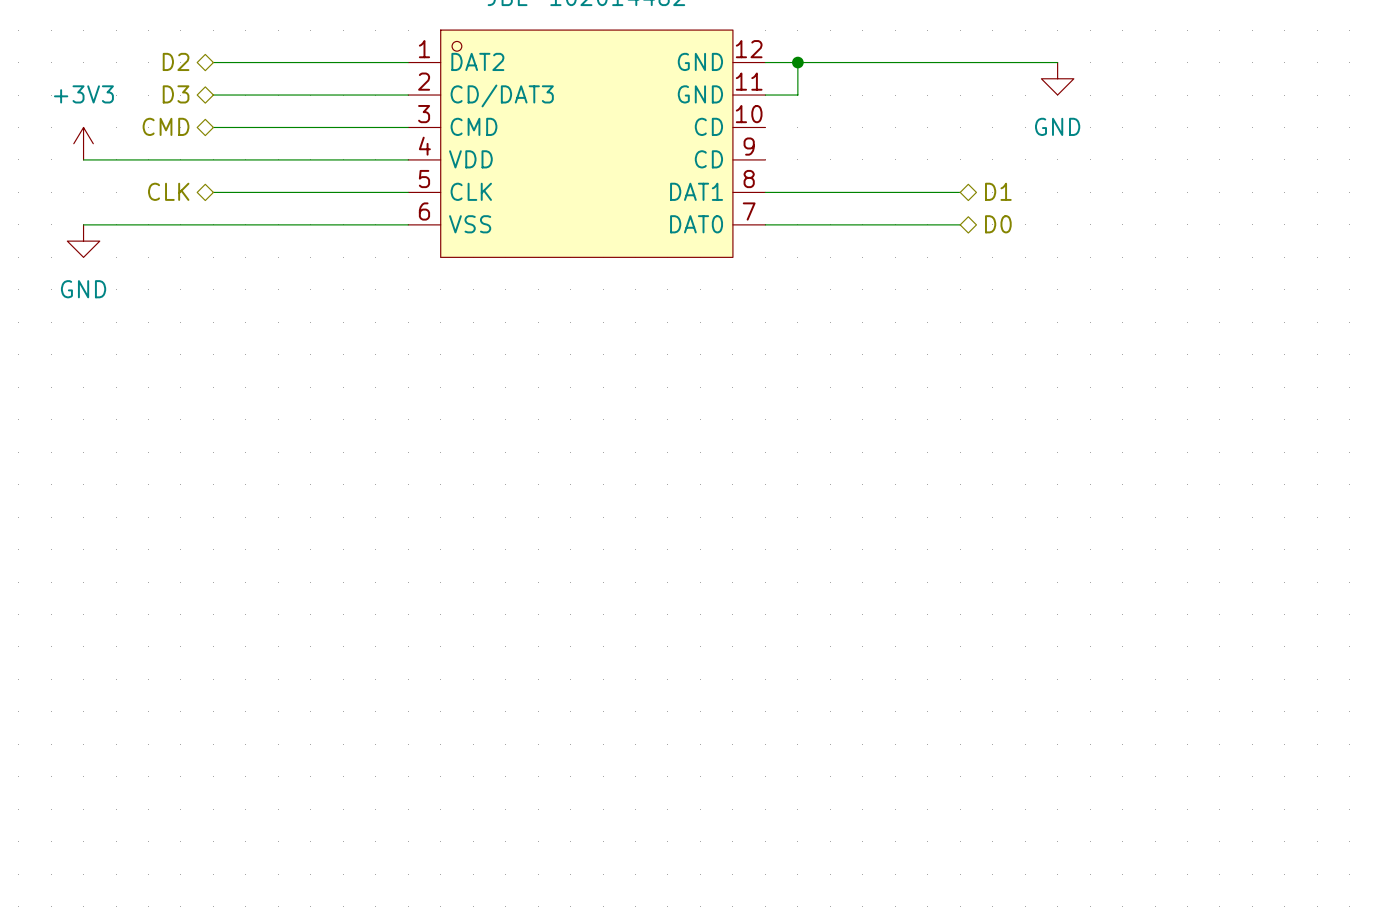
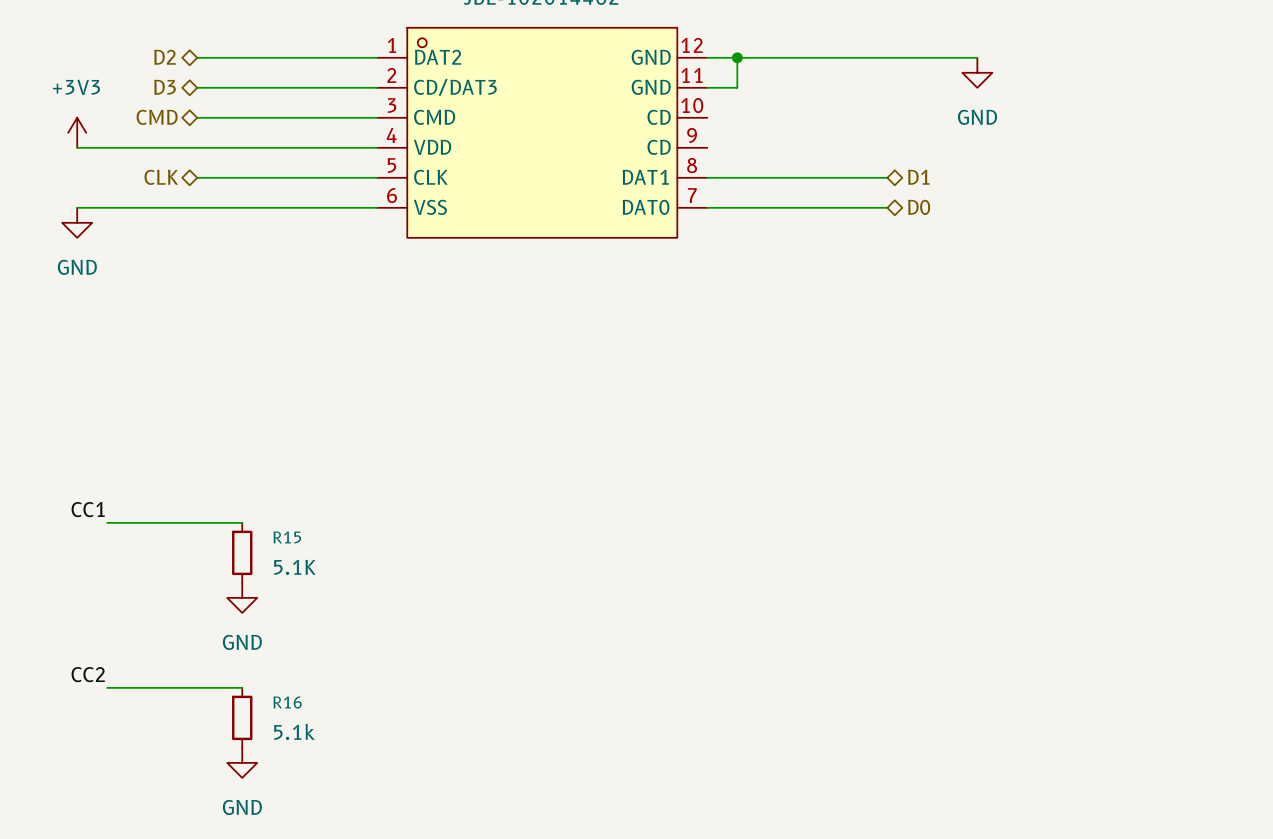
label: none -> CC1 (88, 509)
wire: none -> (107, 522) (242, 522)
R15: none -> 5.1K (242, 552)
power symbol: none -> GND (242, 597)
label: none -> CC2 (88, 674)
wire: none -> (107, 687) (242, 687)
R16: none -> 5.1k (242, 717)
power symbol: none -> GND (242, 762)

